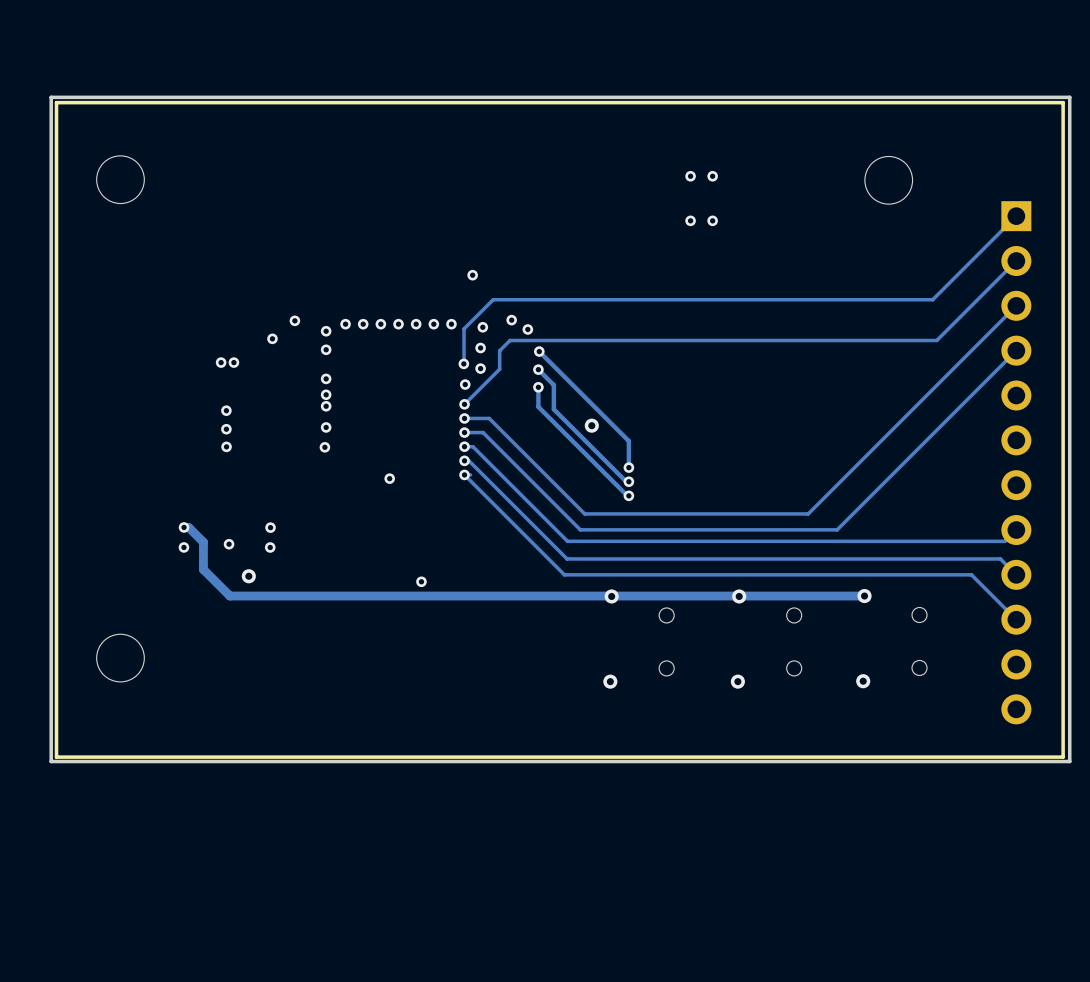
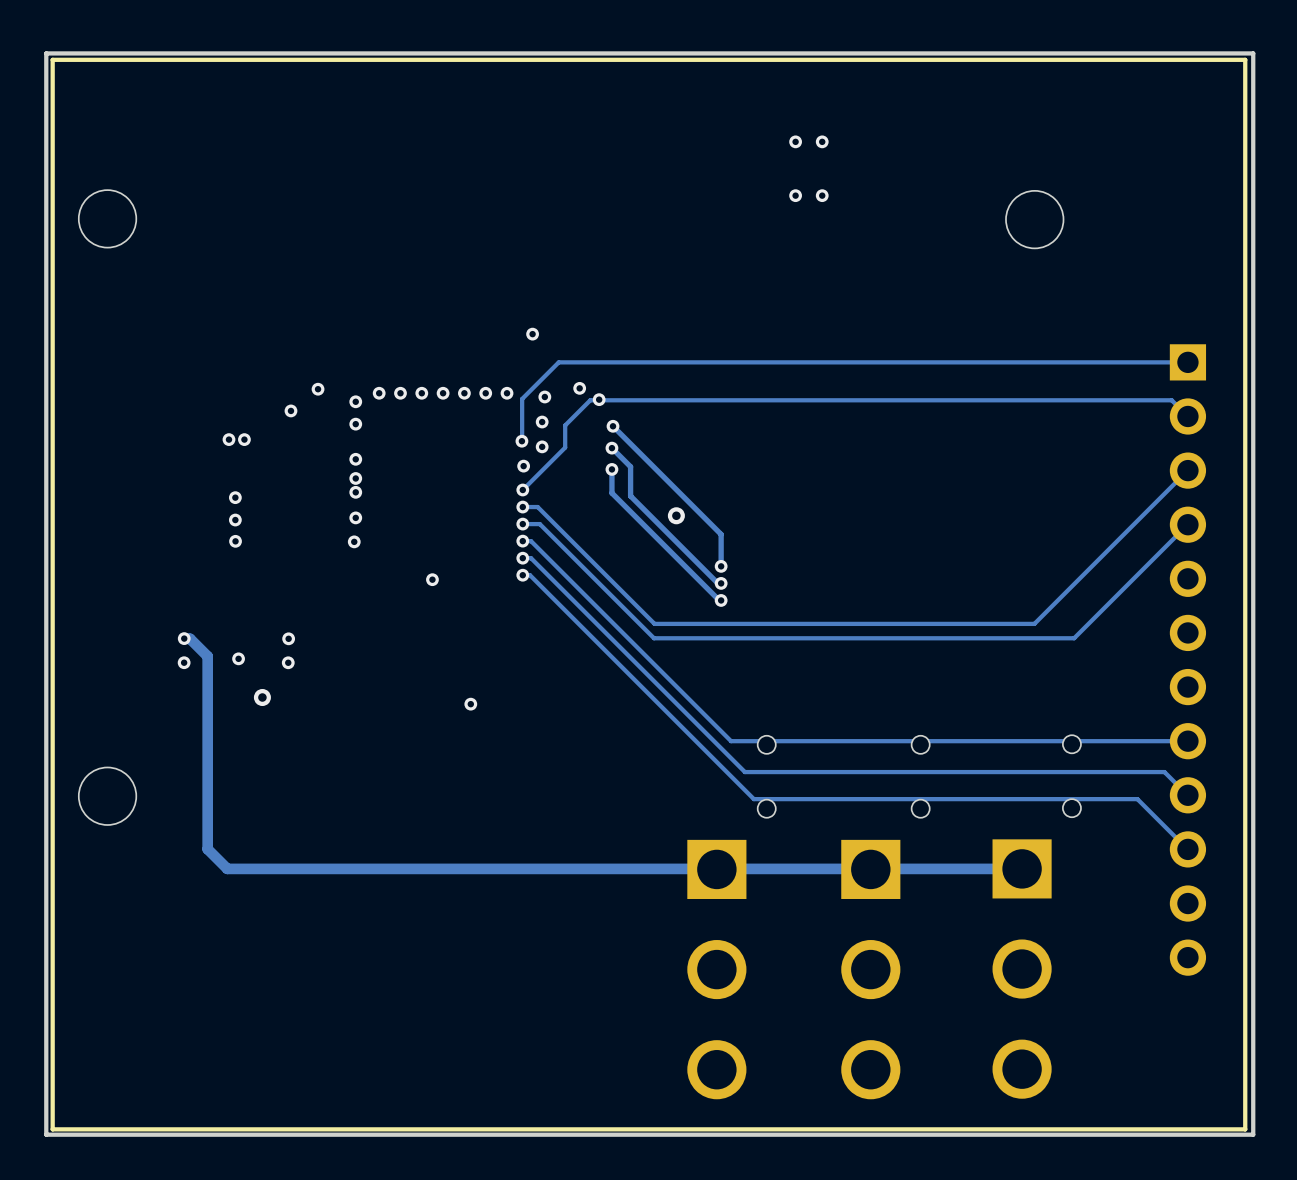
board edge: (1069, 97) (51, 97) (51, 761) (1069, 761) -> (1253, 119) (1253, 53) (46, 53) (46, 1134) (1253, 1134) (1253, 921)
line: (1063, 102) (56, 102) (56, 757) (1063, 757) -> (1245, 125) (1245, 59) (52, 59) (52, 1129) (1245, 1129) (1245, 915)
via: none -> (795, 141)
via: none -> (822, 141)
via: none -> (795, 195)
via: none -> (822, 195)
via: (690, 176) -> none
via: (712, 176) -> none
track: (1016, 216) (932, 299) (493, 299) -> (1187, 362) (557, 363)
via: (690, 220) -> none
via: (712, 220) -> none
track: (1016, 260) (936, 340) (509, 340) -> (1187, 416) (1171, 400) (590, 400) (577, 412)
track: (1016, 305) (808, 513) (584, 513) (489, 418) (476, 418) -> (1187, 470) (1034, 623) (654, 623) (537, 507)
track: (1016, 350) (837, 529) (580, 529) (483, 432) (478, 432) -> (1187, 524) (1074, 638) (654, 638) (539, 524)
track: (471, 446) (567, 541) (1005, 541) (1016, 530) -> (531, 541) (731, 741) (1187, 741)
track: (468, 460) (567, 558) (1000, 558) (1016, 574) -> (528, 558) (531, 558) (744, 772) (1164, 772) (1187, 795)
part position: (1016, 462) -> (1187, 660)
track: (464, 474) (564, 574) (971, 574) (1016, 619) -> none
track: none -> (529, 575) (753, 799) (1137, 799) (1187, 849)
track: (203, 569) (229, 596) (864, 596) -> (207, 689) (207, 849) (227, 868) (1022, 868)
via: (611, 596) -> none
via: (739, 596) -> none
via: (864, 596) -> none
via: (610, 681) -> none
via: (737, 681) -> none
via: (863, 681) -> none
part: none -> (716, 969)
part: none -> (870, 969)
part: none -> (1022, 969)

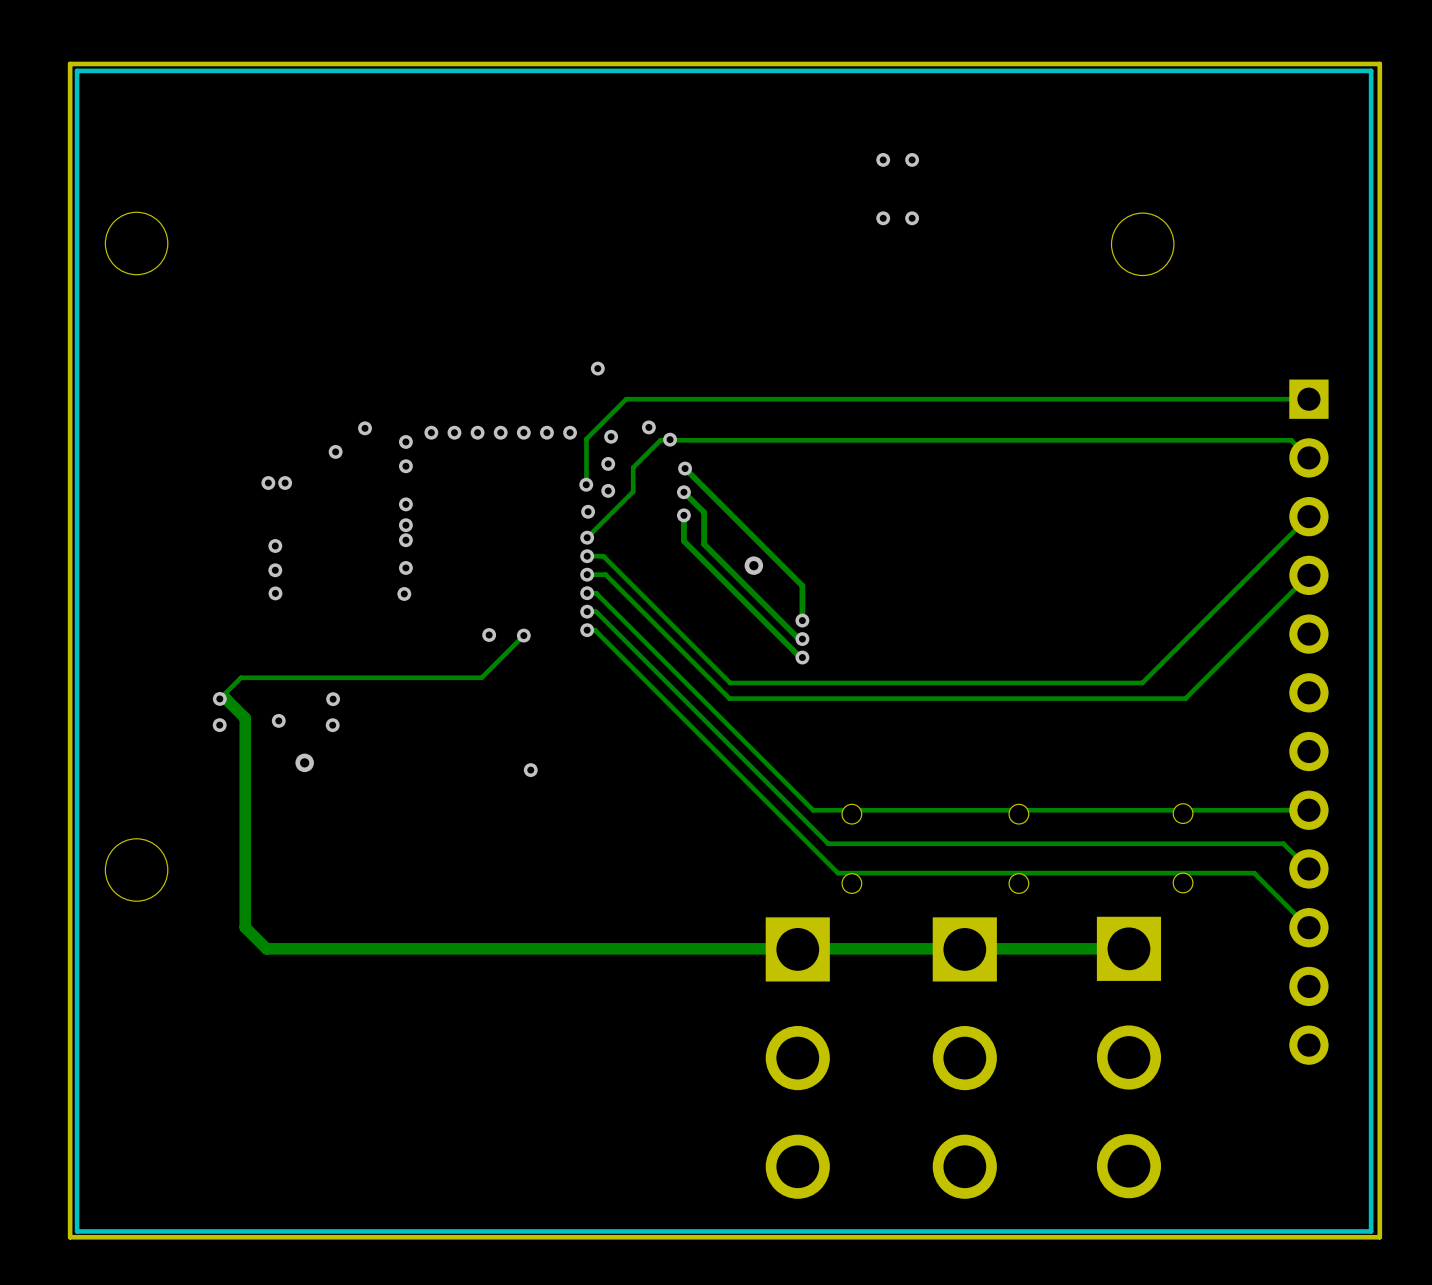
track: none -> (523, 635) (481, 677) (240, 677) (219, 698)
via: none -> (523, 635)

